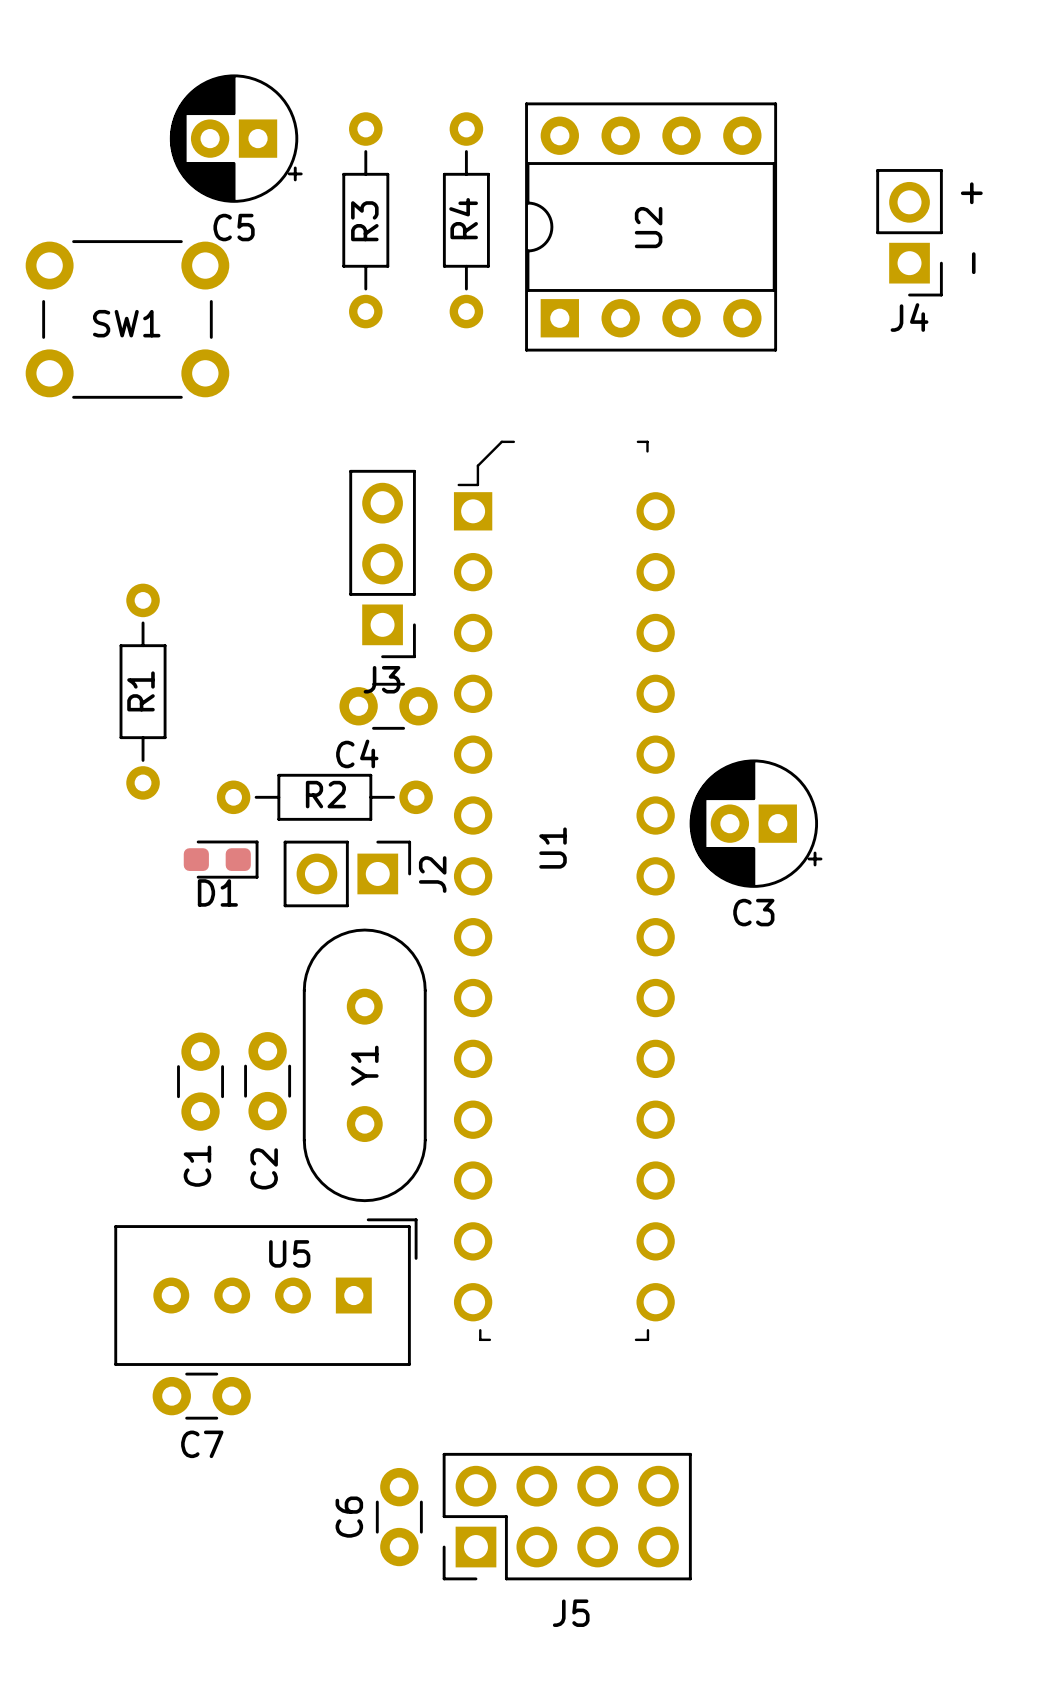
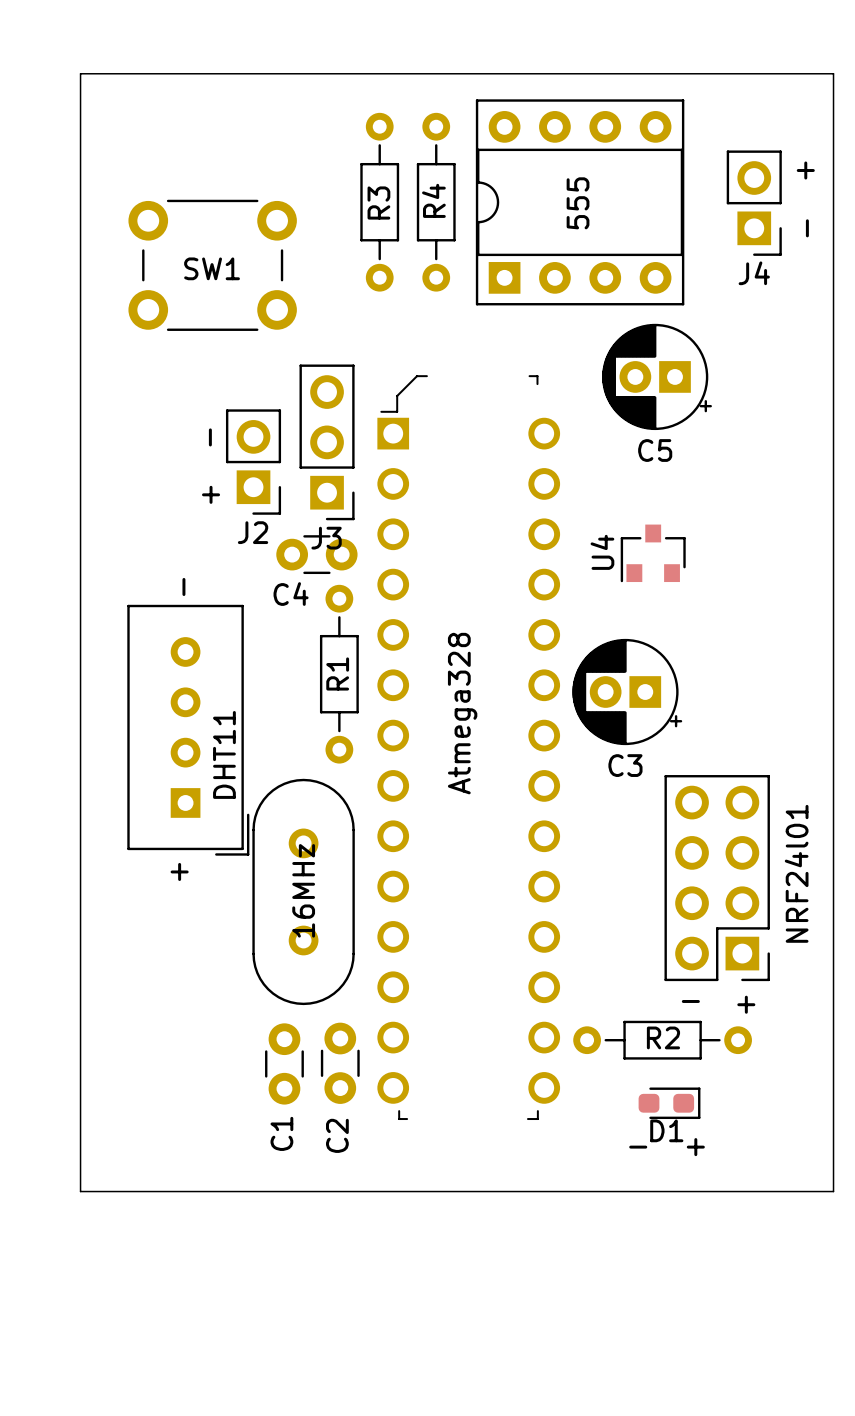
board edge: none -> (80, 73) (80, 1191) (833, 1191) (833, 73) (80, 73)
C5 position: (236, 138) -> (657, 376)
R3 position: (365, 220) -> (379, 202)
R4 position: (466, 220) -> (436, 202)
U2: (651, 226) -> none
555: none -> (580, 202)
SW1 position: (127, 319) -> (212, 265)
text: none -> - (210, 437)
J3 position: (382, 564) -> (327, 442)
text: none -> + (211, 494)
U4: none -> (653, 553)
R1 position: (143, 691) -> (339, 674)
text: none -> - (183, 586)
C4 position: (388, 706) -> (316, 554)
R2 position: (324, 797) -> (662, 1040)
U1 name: U1 (553, 848) -> Atmega328 (462, 713)
D1 position: (221, 859) -> (669, 1103)
DHT11: none -> (188, 730)
J2 rotation: 0° (347, 873) -> 90° clockwise (253, 462)
J2 position: (347, 873) -> (253, 462)
text: none -> + (179, 871)
NRF24l01: none -> (717, 878)
Y1 name: Y1 (364, 1065) -> 16MHz (303, 890)
C1 position: (200, 1081) -> (284, 1063)
C2 position: (267, 1081) -> (340, 1063)
text: none -> - (690, 1001)
text: none -> + (746, 1004)
U5: (265, 1292) -> none
text: none -> - (638, 1147)
text: none -> + (695, 1147)
C7: (201, 1396) -> none
J5: (567, 1516) -> none
C6: (399, 1517) -> none

